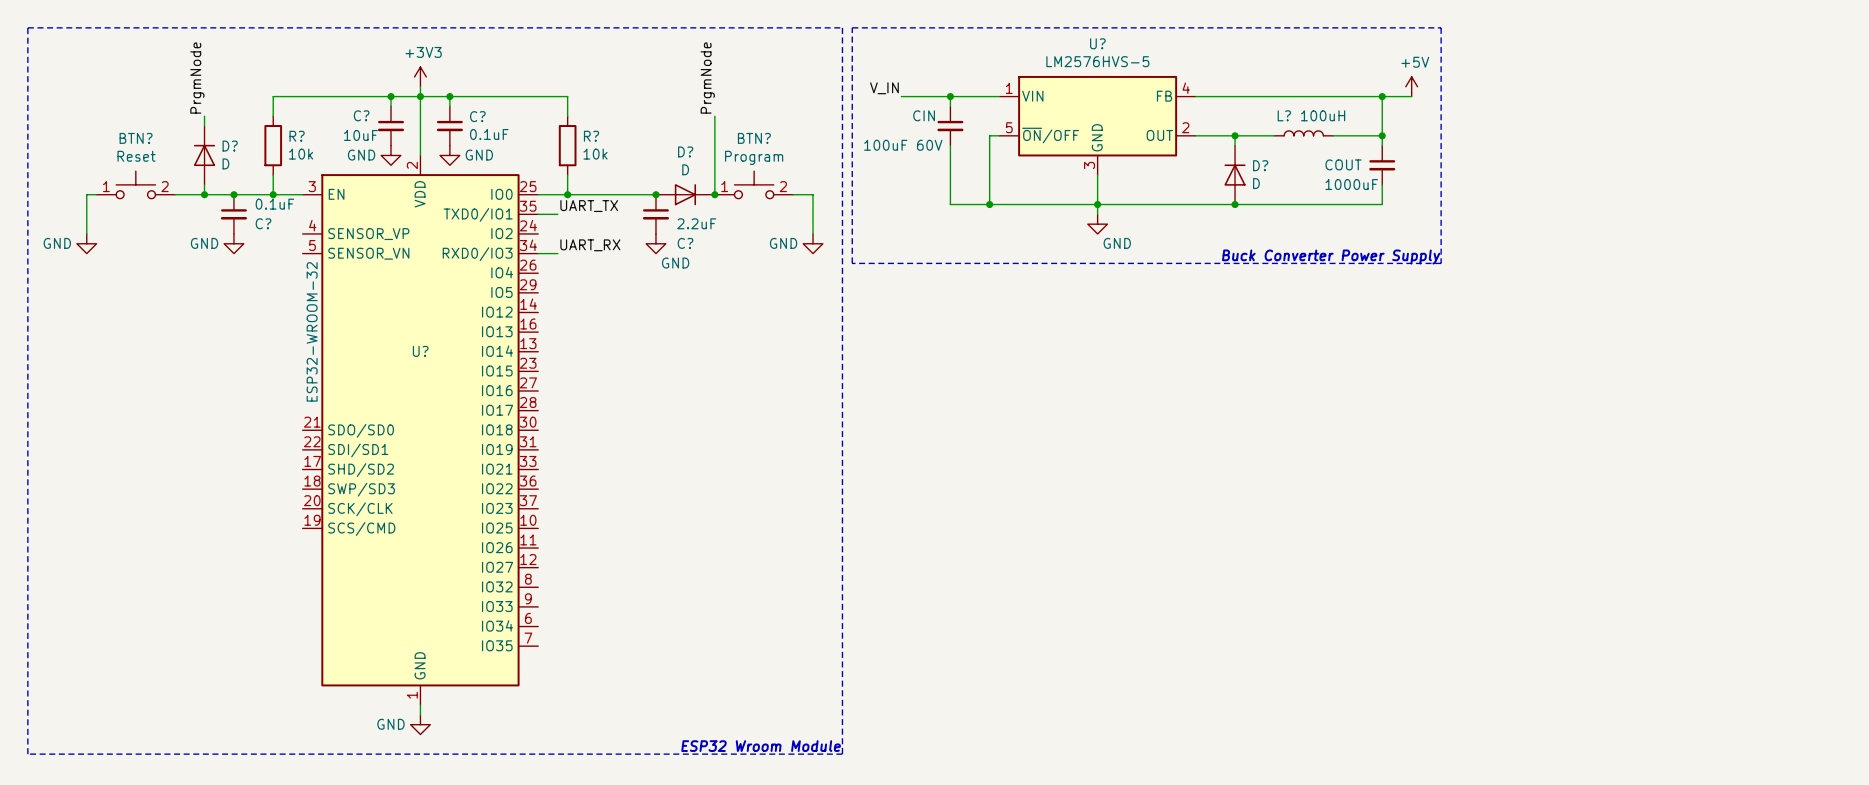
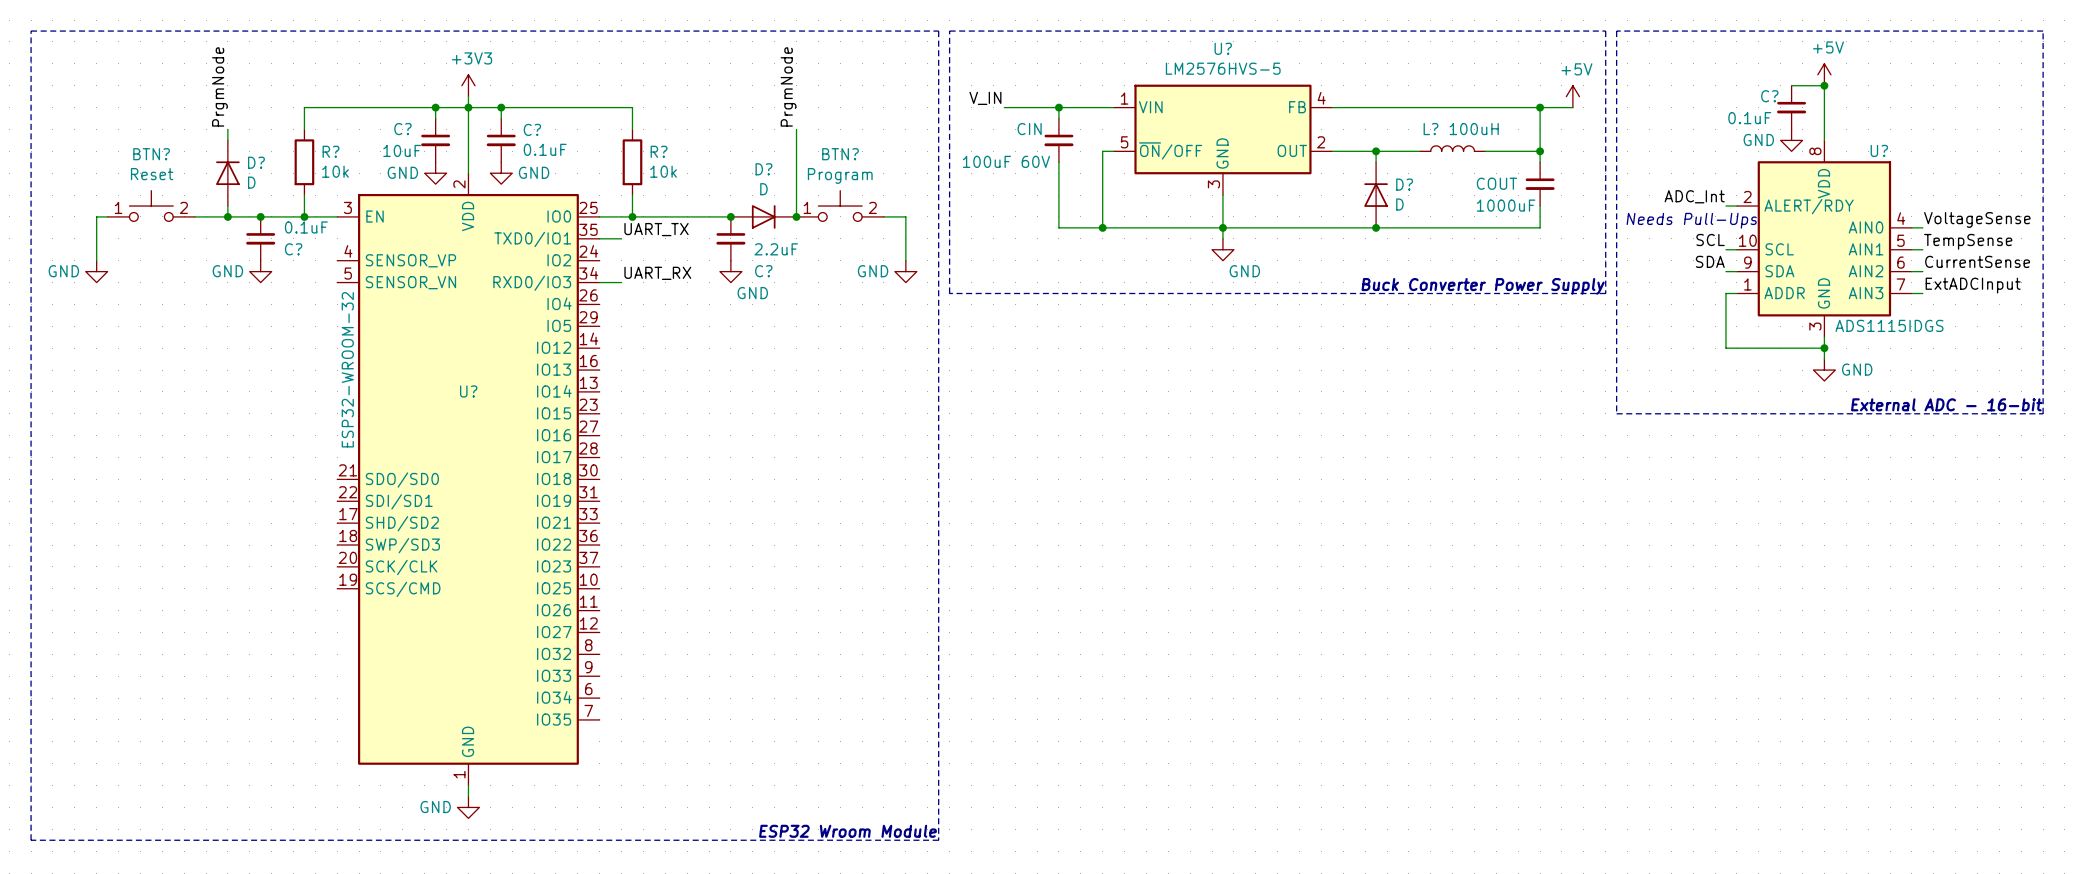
line: none -> (1616, 31) (1616, 413) (2043, 413) (2043, 31) (1616, 31)
power symbol: none -> +5V (1824, 74)
wire: none -> (1791, 85) (1824, 85) (1824, 140)
junction: none -> (1824, 85)
C?: none -> 0.1uF (1791, 107)
power symbol: none -> GND (1791, 140)
label: none -> ADC_Int (1694, 196)
wire: none -> (1725, 206) (1736, 206)
label: none -> VoltageSense (1977, 219)
text: none -> Needs Pull-Ups (1691, 220)
wire: none -> (1911, 227) (1922, 227)
U?: none -> ADS1115IDGS (1824, 238)
label: none -> SCL (1710, 240)
label: none -> TempSense (1968, 241)
wire: none -> (1725, 249) (1736, 249)
wire: none -> (1911, 249) (1922, 249)
label: none -> SDA (1710, 261)
label: none -> CurrentSense (1977, 261)
wire: none -> (1725, 271) (1736, 271)
wire: none -> (1911, 271) (1922, 271)
label: none -> ExtADCInput (1973, 285)
wire: none -> (1736, 293) (1725, 293) (1725, 348) (1824, 348)
wire: none -> (1911, 293) (1922, 293)
wire: none -> (1824, 337) (1824, 359)
junction: none -> (1824, 348)
power symbol: none -> GND (1824, 370)
text: none -> External ADC - 16-bit (1946, 404)

